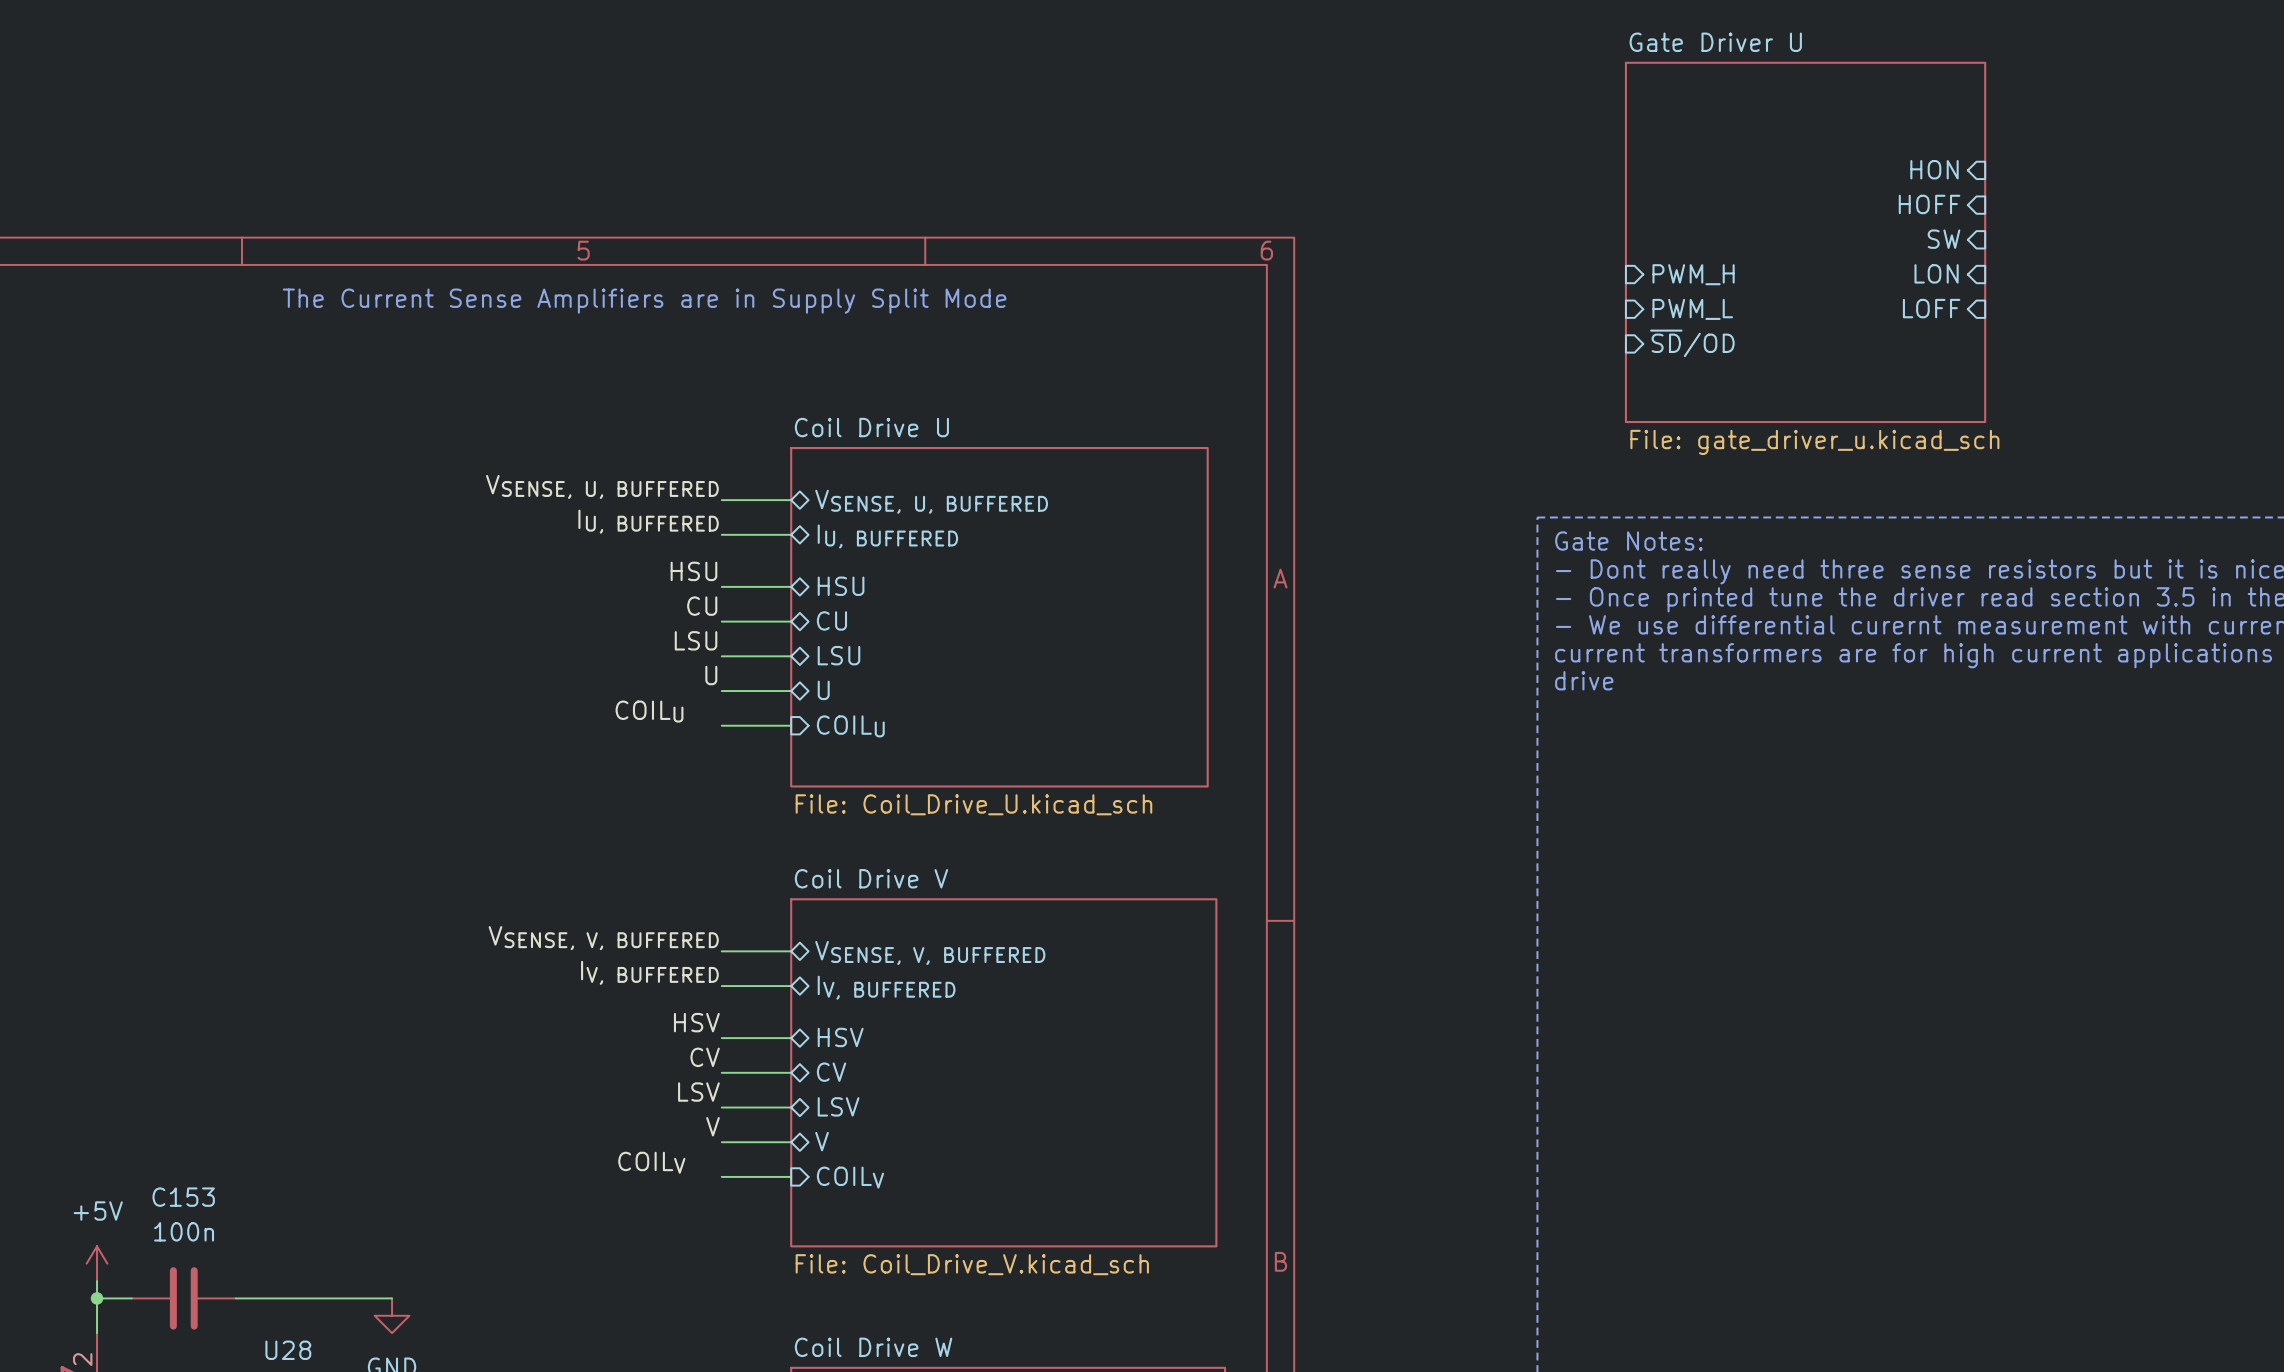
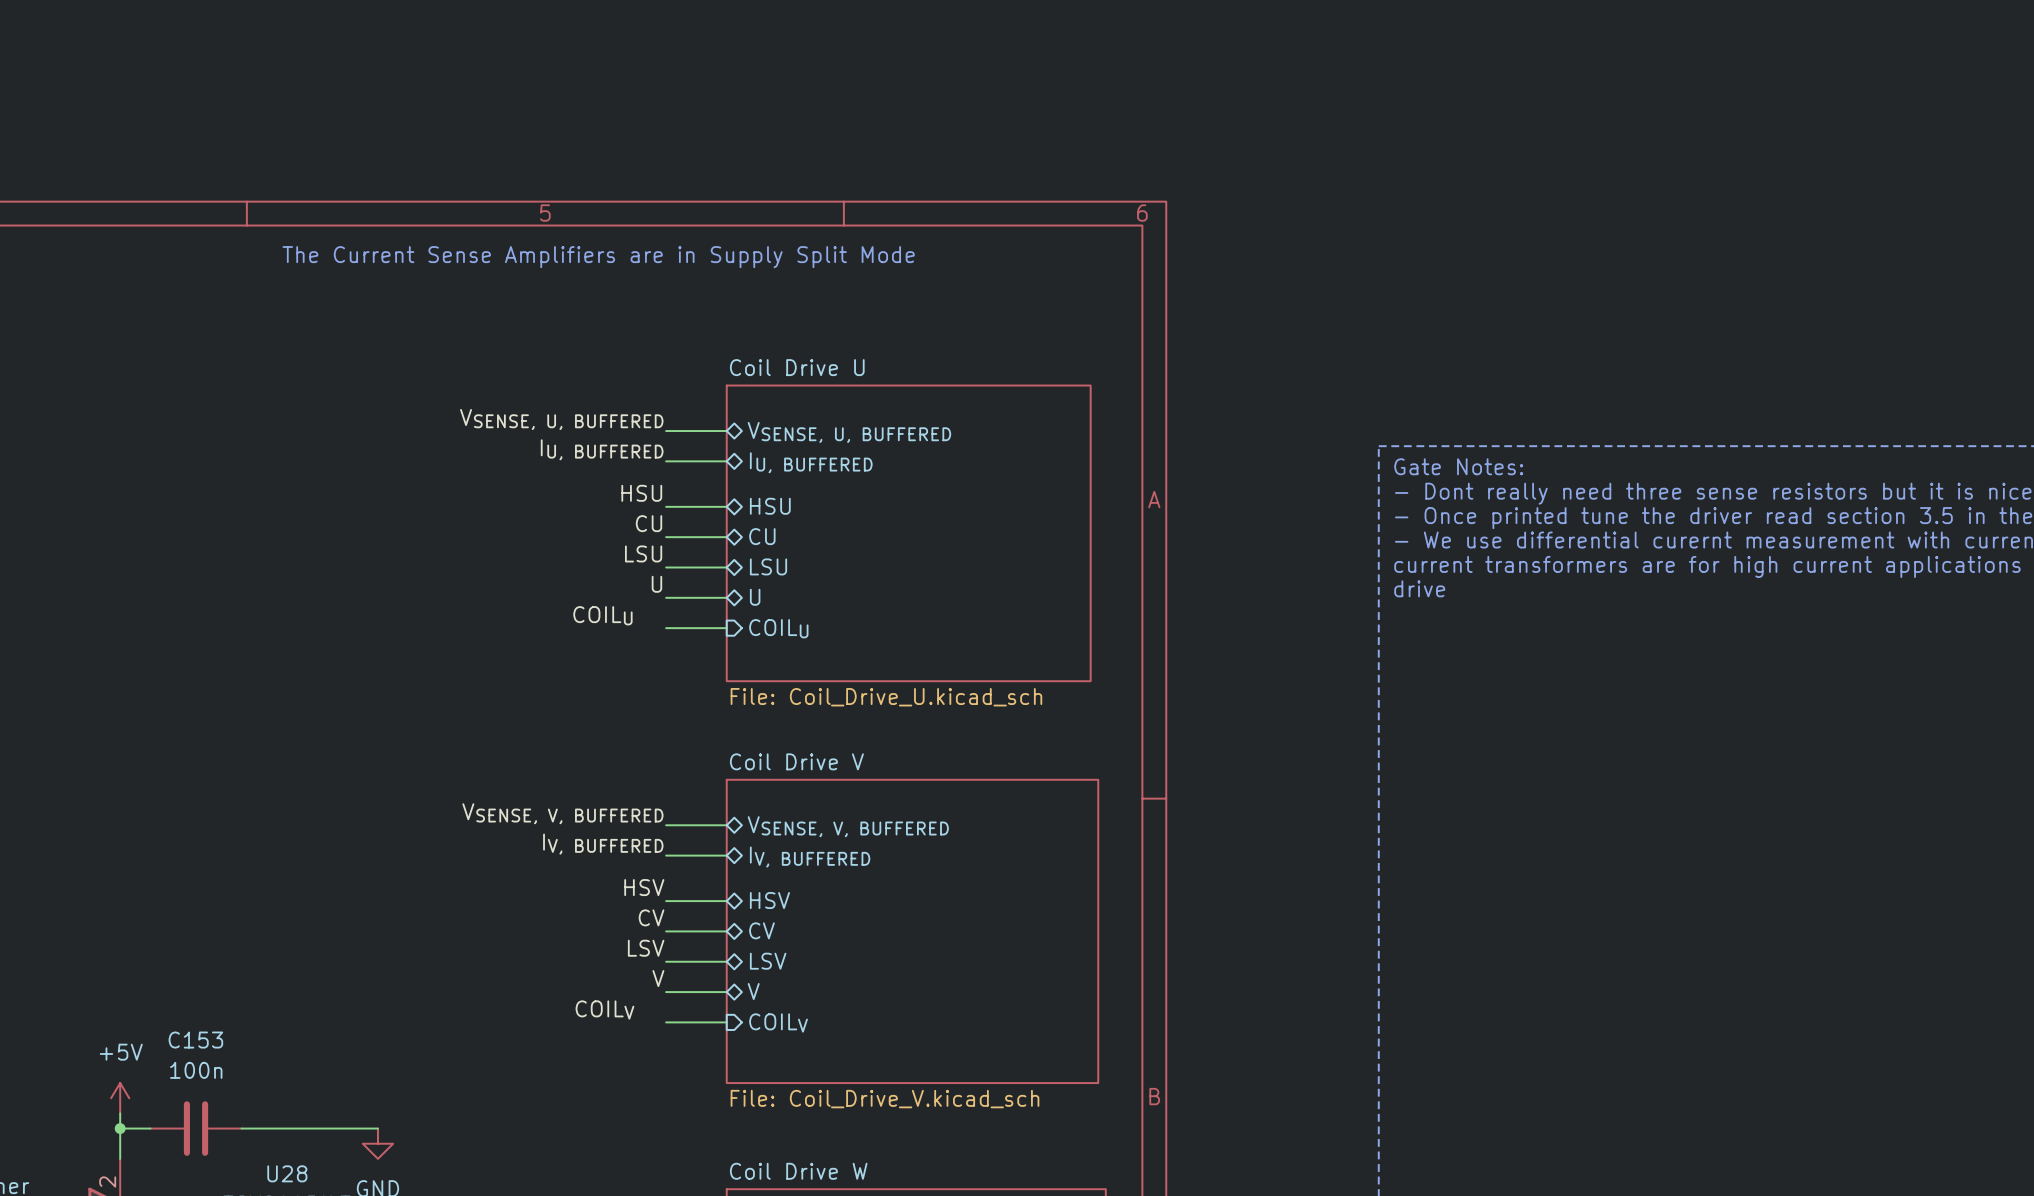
sheet pin: HON (1934, 169) -> none
sheet pin: HOFF (1929, 204) -> none
sheet pin: SW (1944, 239) -> none
sheet Gate Driver U: File: gate_driver_u.kicad_sch (1805, 242) -> none
sheet pin: LON (1936, 273) -> none
sheet pin: PWM_H (1693, 274) -> none
sheet pin: LOFF (1931, 308) -> none
sheet pin: PWM_L (1692, 309) -> none
sheet pin: ~{SD}/OD (1692, 343) -> none

